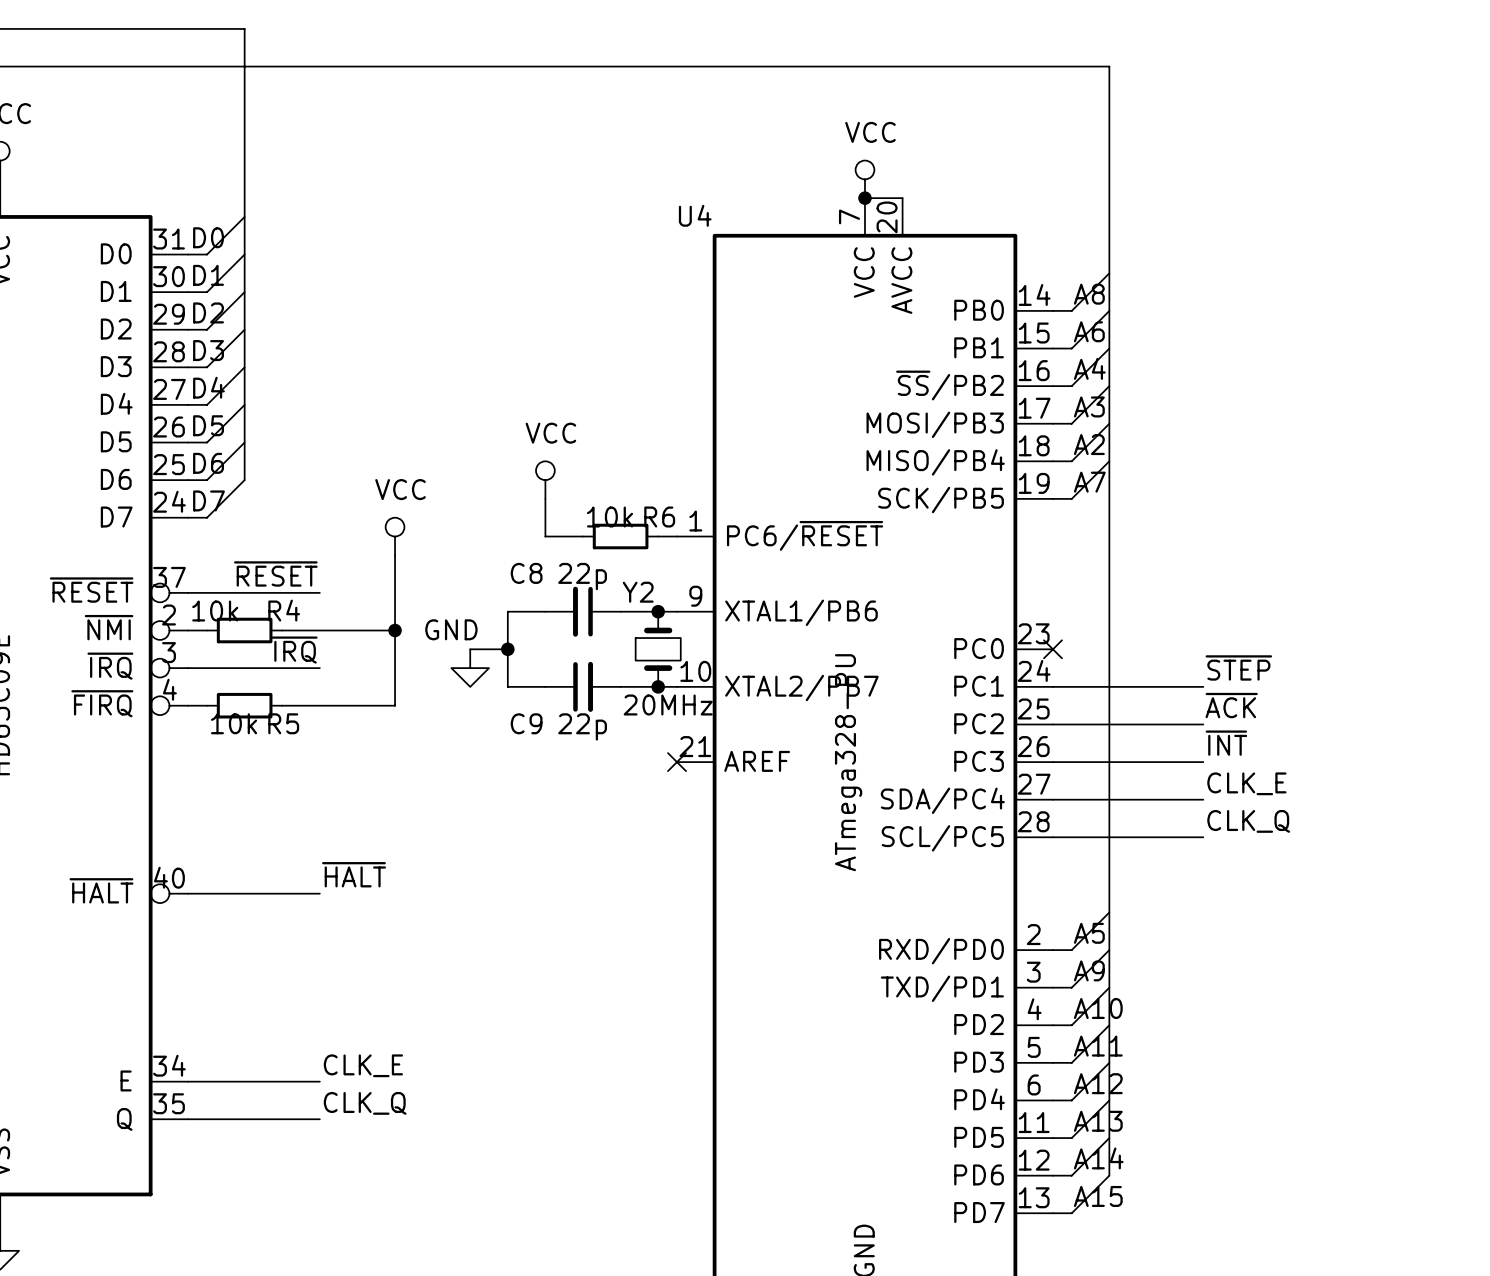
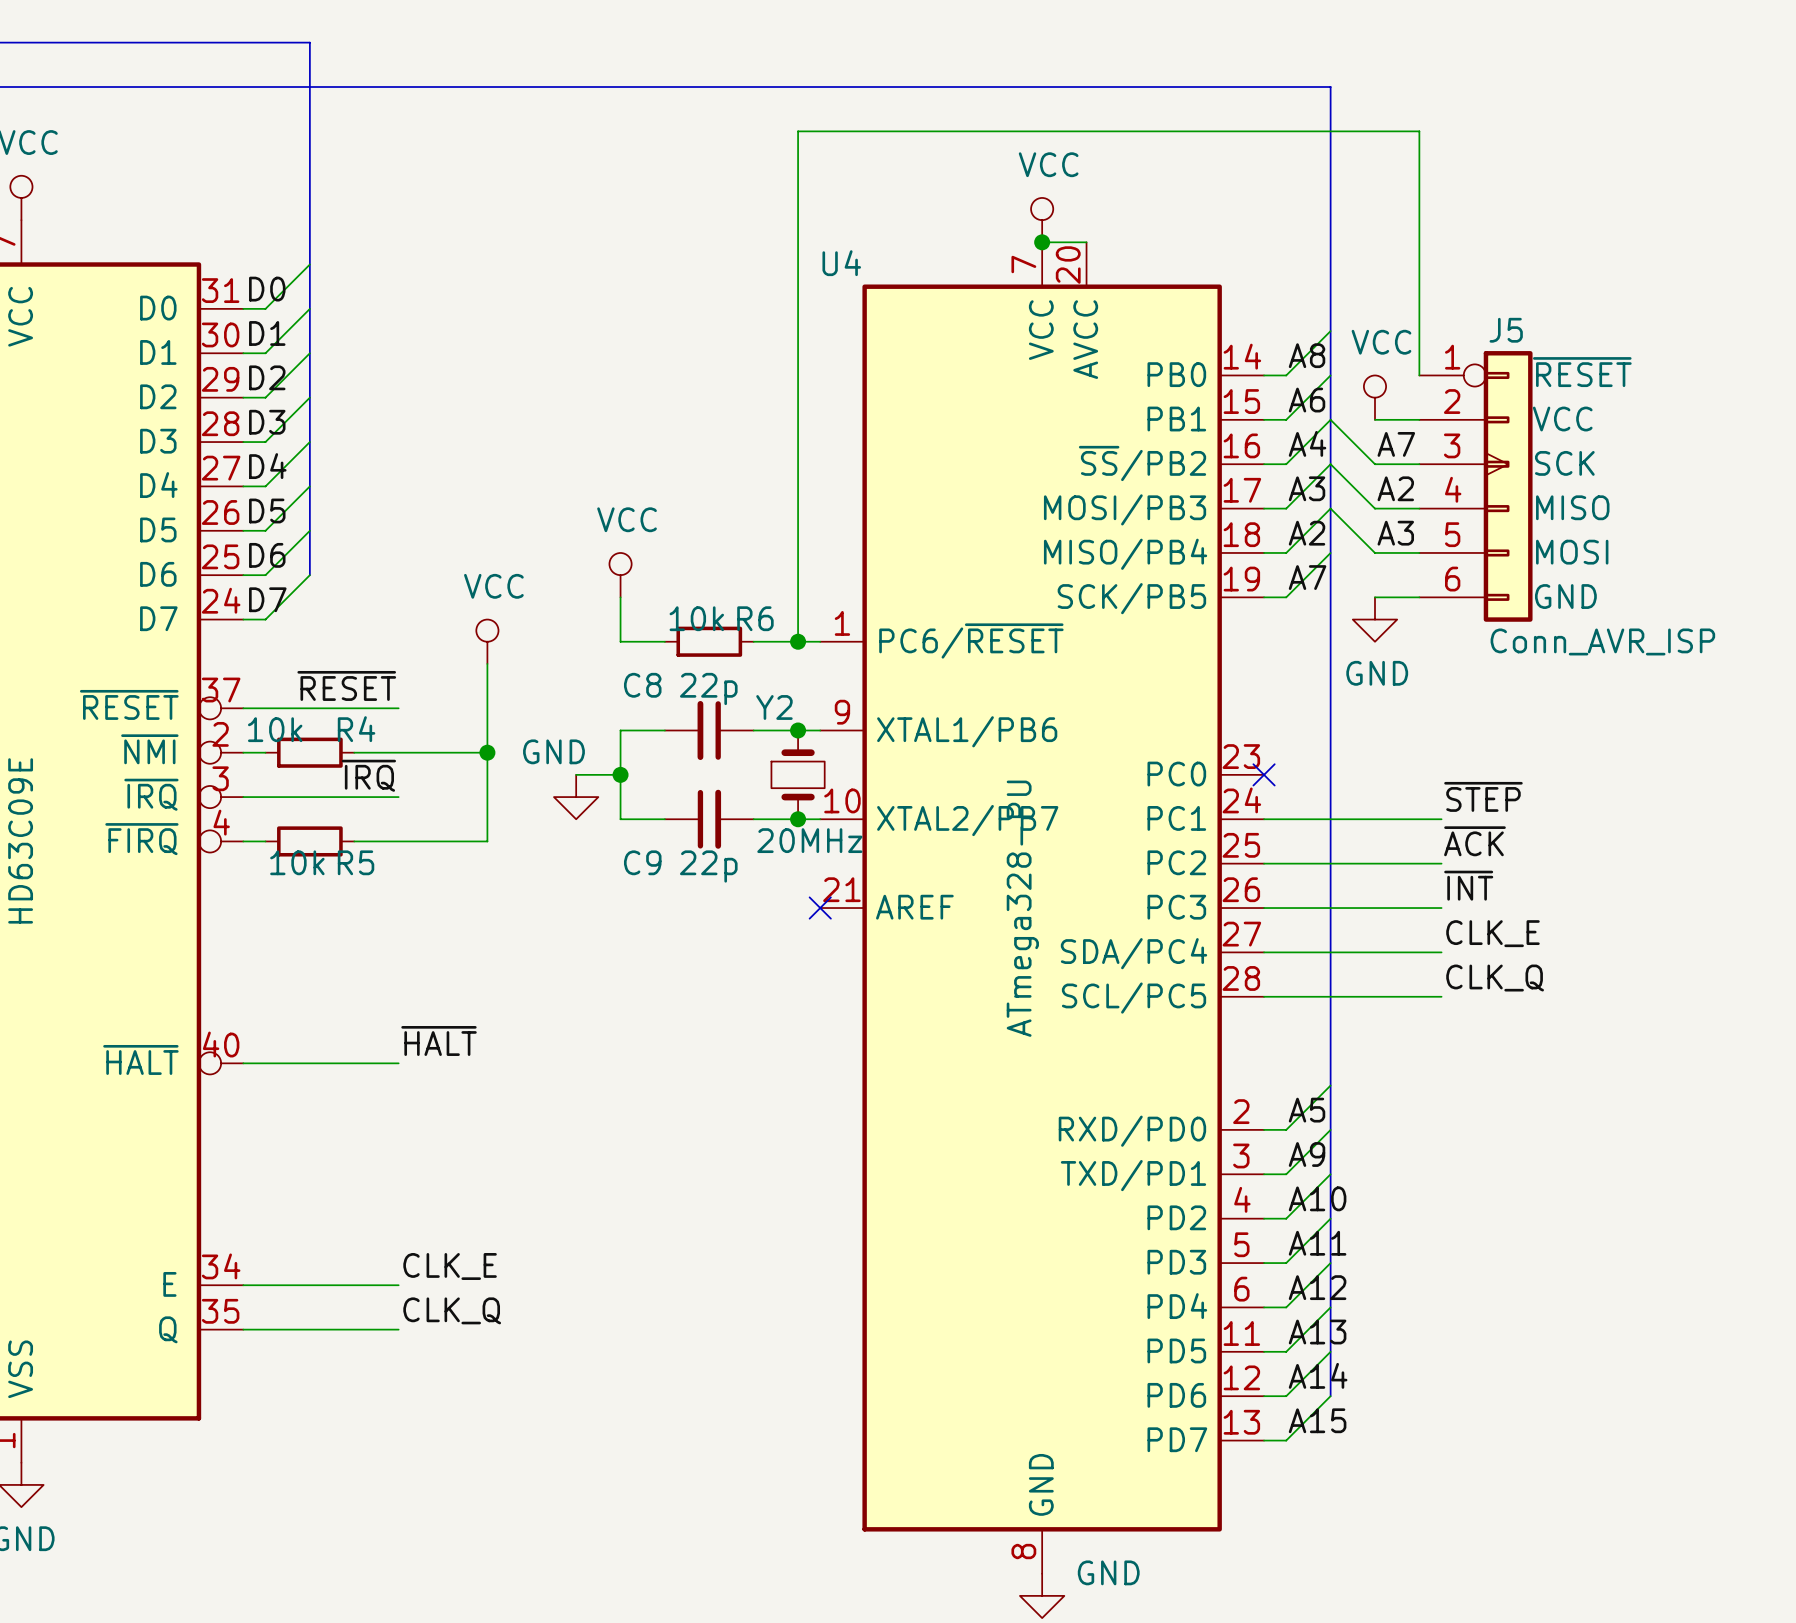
wire: none -> (1419, 375) (1419, 131) (798, 131) (798, 641) (753, 641)
power symbol: none -> VCC (1375, 397)
wire: none -> (1330, 419) (1375, 464) (1419, 464)
wire: none -> (1375, 419) (1419, 419)
label: none -> A7 (1396, 444)
wire: none -> (1330, 464) (1375, 508) (1419, 508)
J5: none -> Conn_AVR_ISP (1475, 486)
label: none -> A2 (1395, 488)
wire: none -> (1330, 508) (1375, 552) (1419, 552)
label: none -> A3 (1395, 533)
power symbol position: VCC (545, 480) -> VCC (620, 575)
wire: (545, 498) (545, 536) (583, 536) -> (620, 597) (620, 641) (664, 641)
wire: none -> (1375, 597) (1419, 597)
power symbol: none -> GND (1375, 619)
R6 position: (620, 536) -> (709, 641)
junction: none -> (798, 641)

